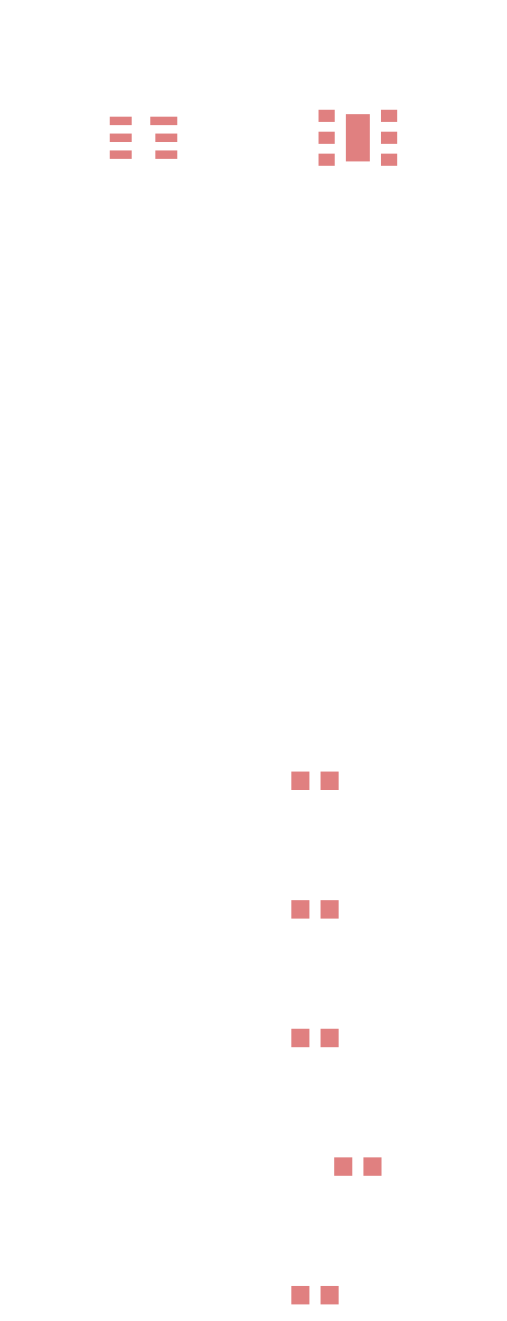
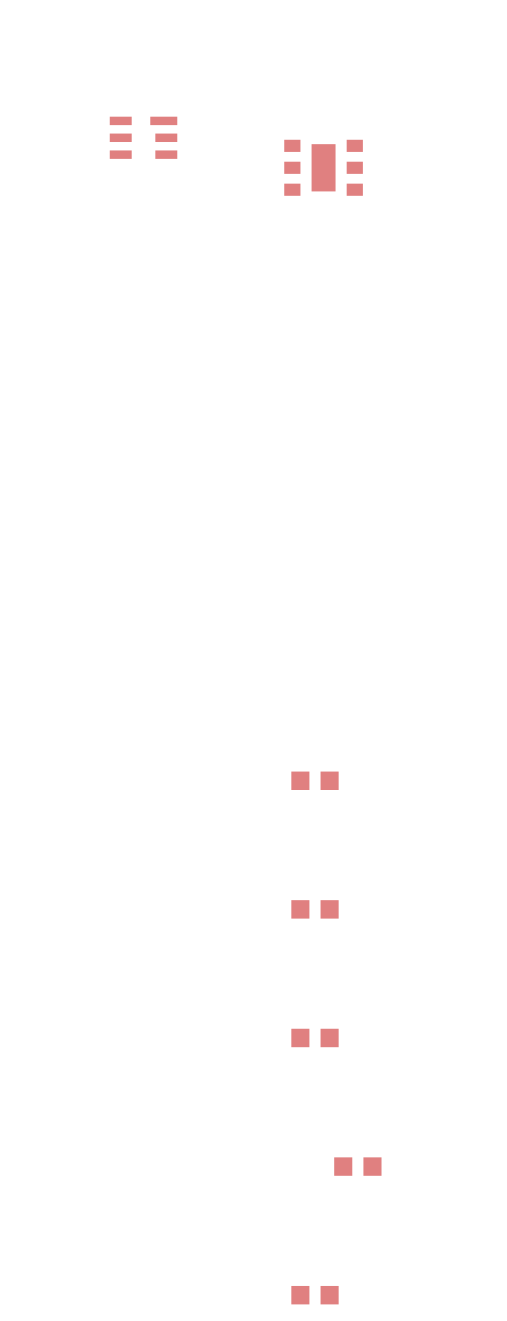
part position: (357, 137) -> (323, 167)

